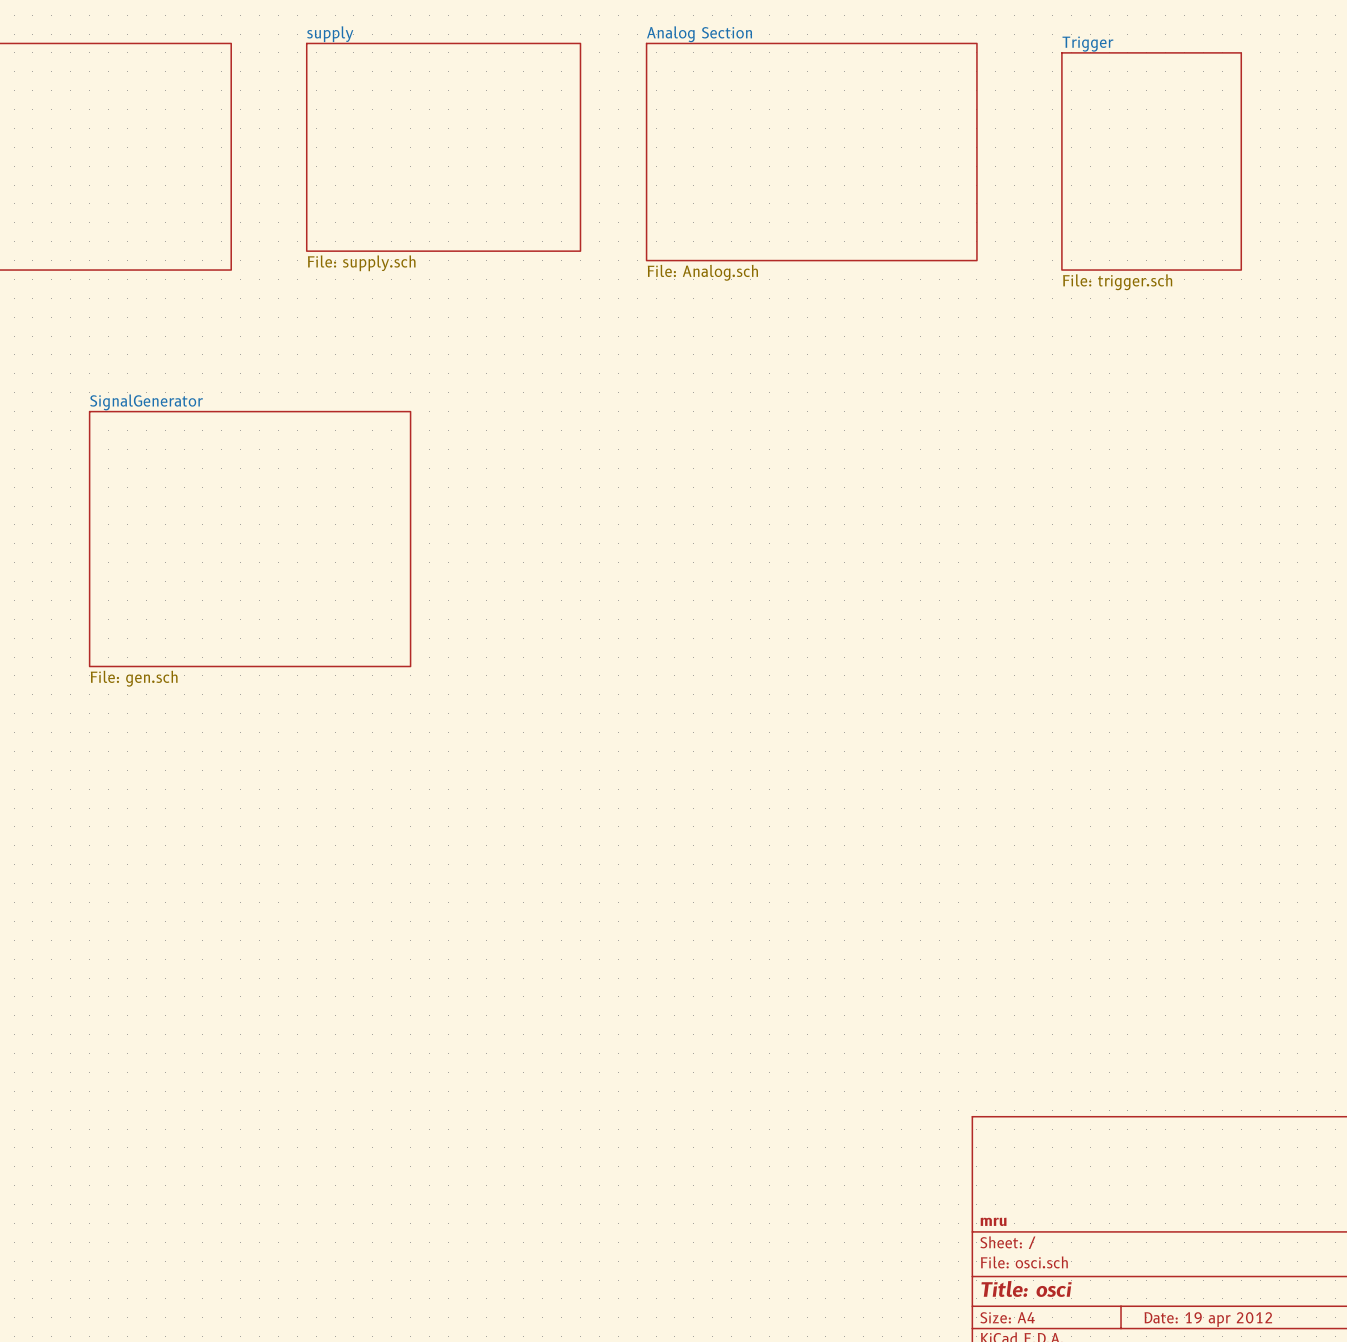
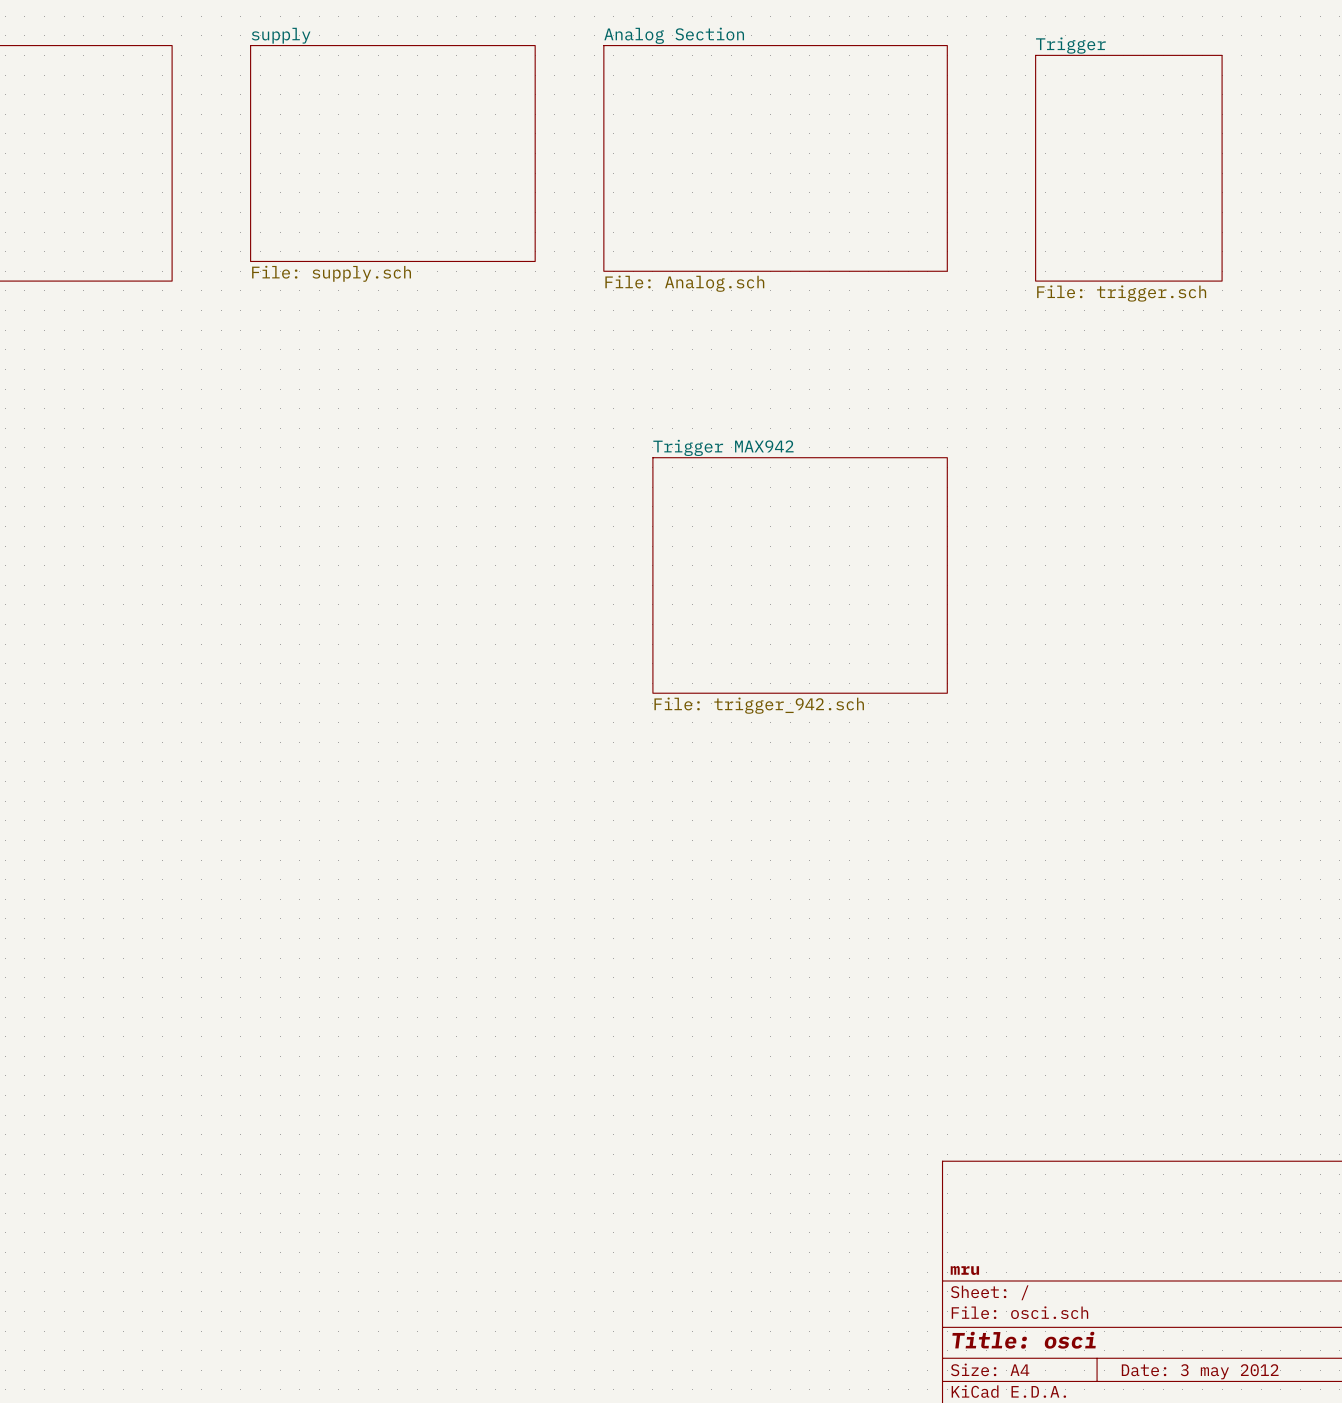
sheet SignalGenerator: File: gen.sch (250, 539) -> none
sheet Trigger MAX942: none -> File: trigger_942.sch (800, 575)
title block: Date: 19 apr 2012 (1208, 1319) -> Date: 3 may 2012 (1200, 1371)

